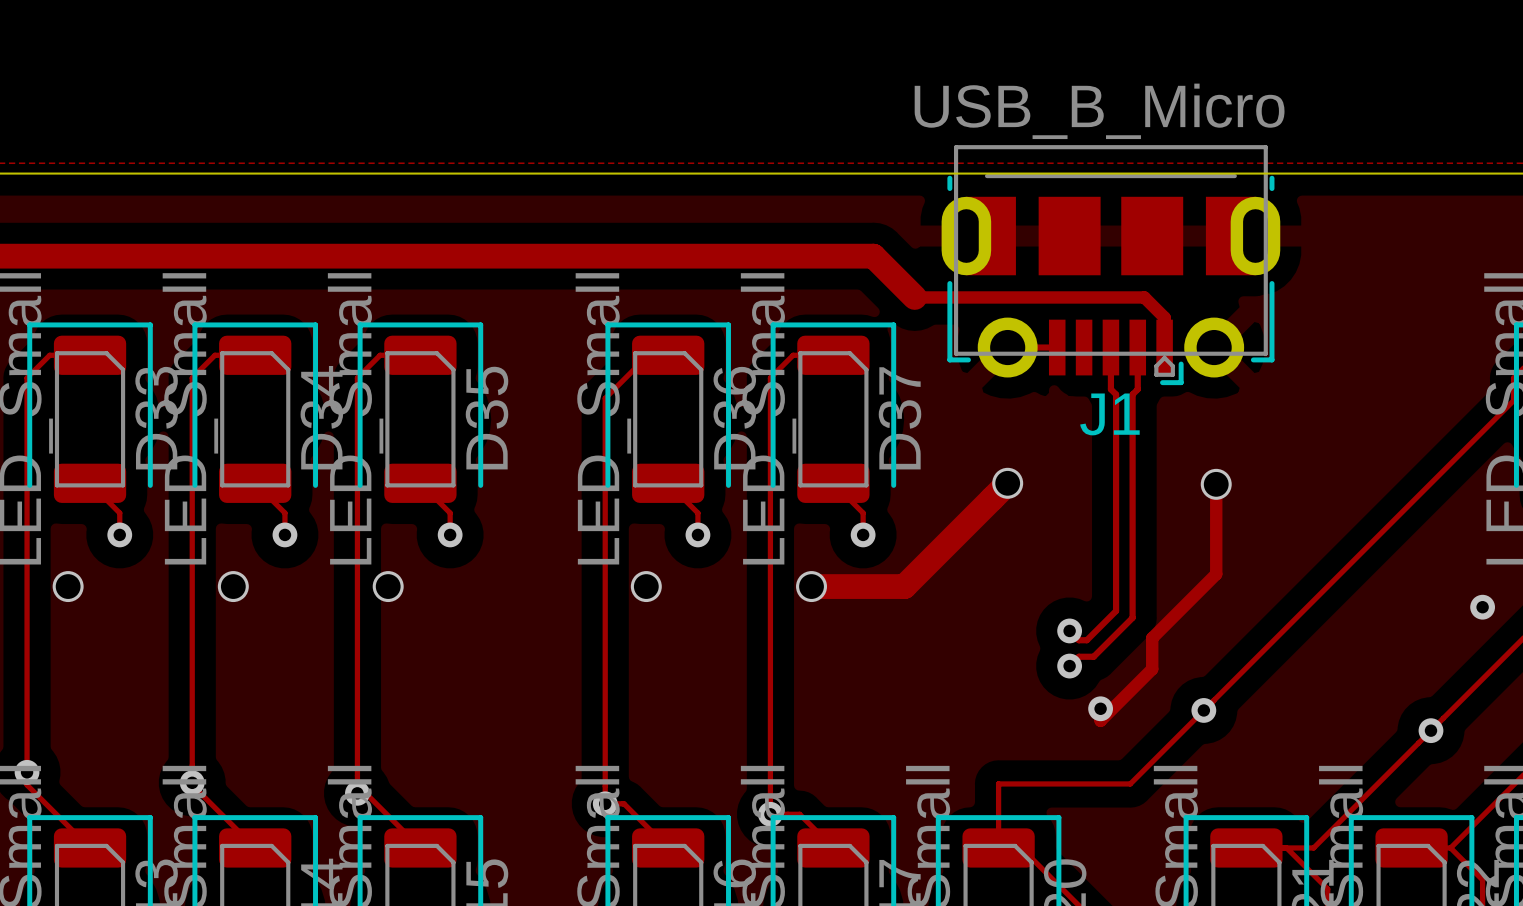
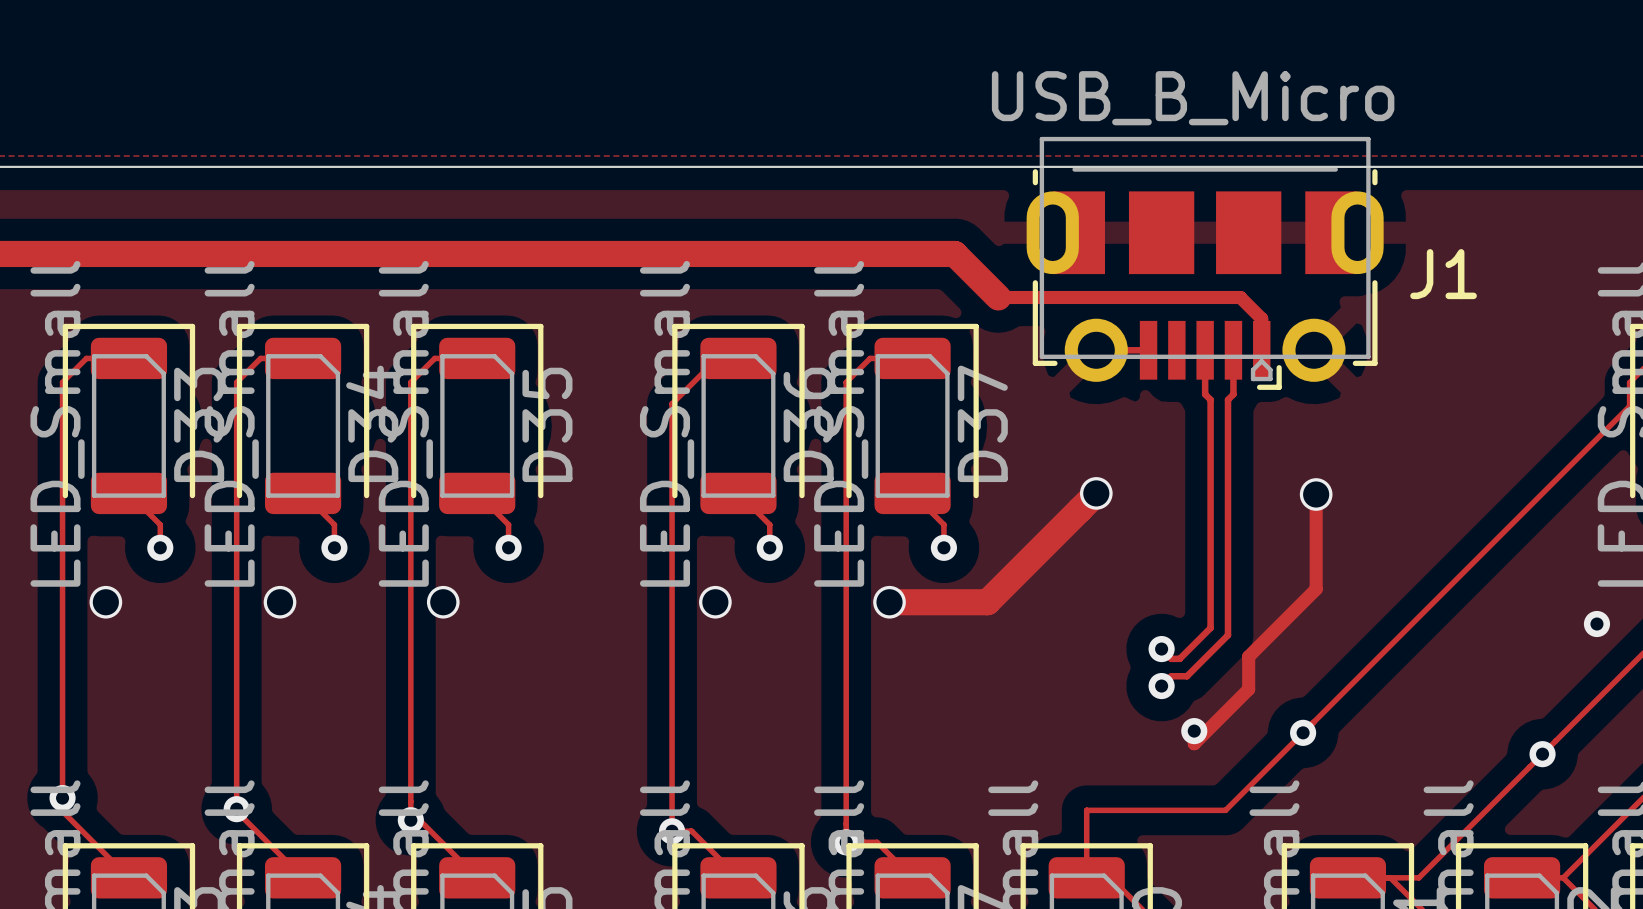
J1 name position: J1 (1109, 414) -> J1 (1443, 274)

